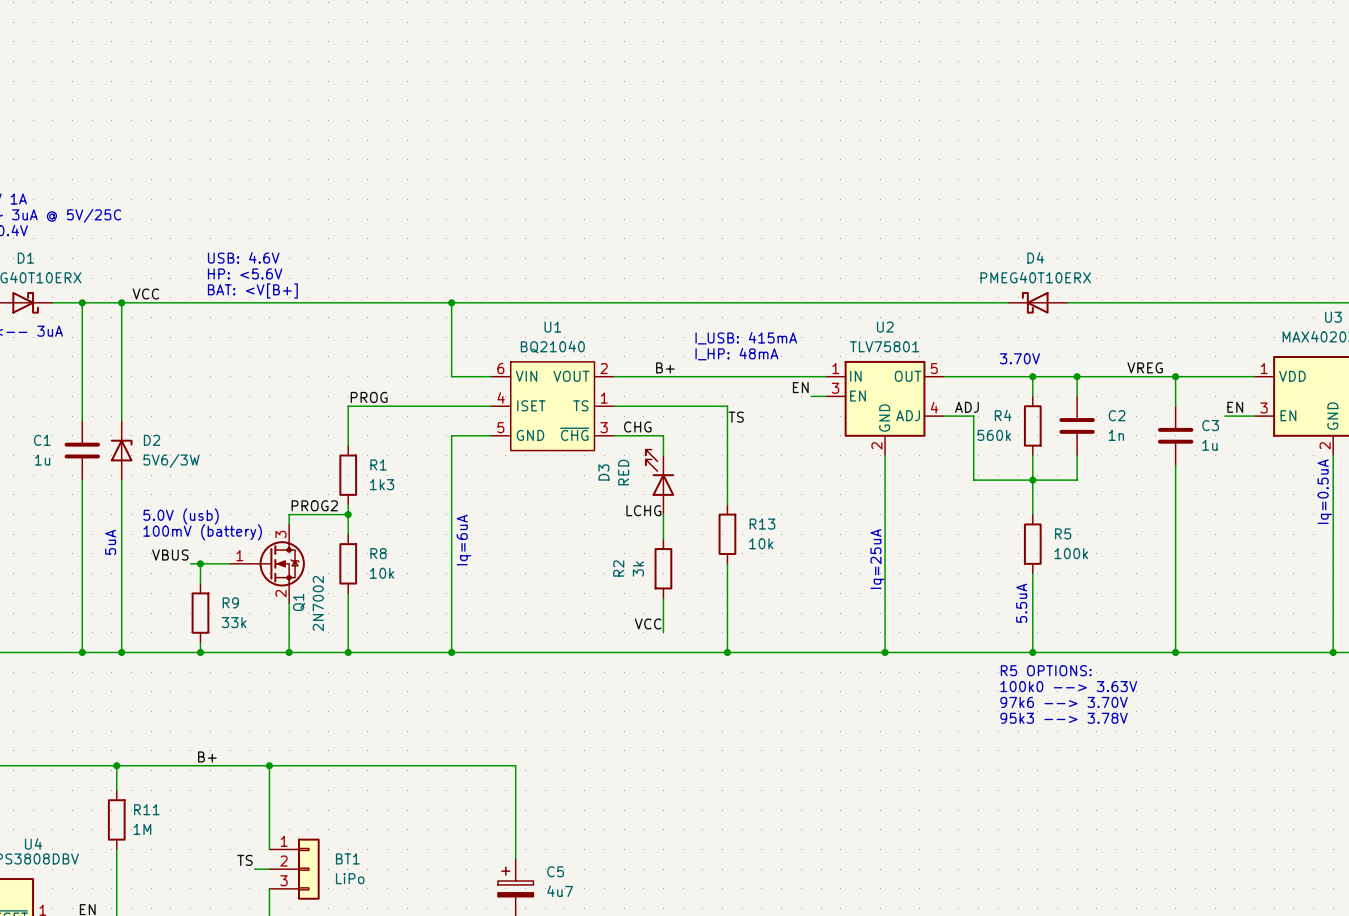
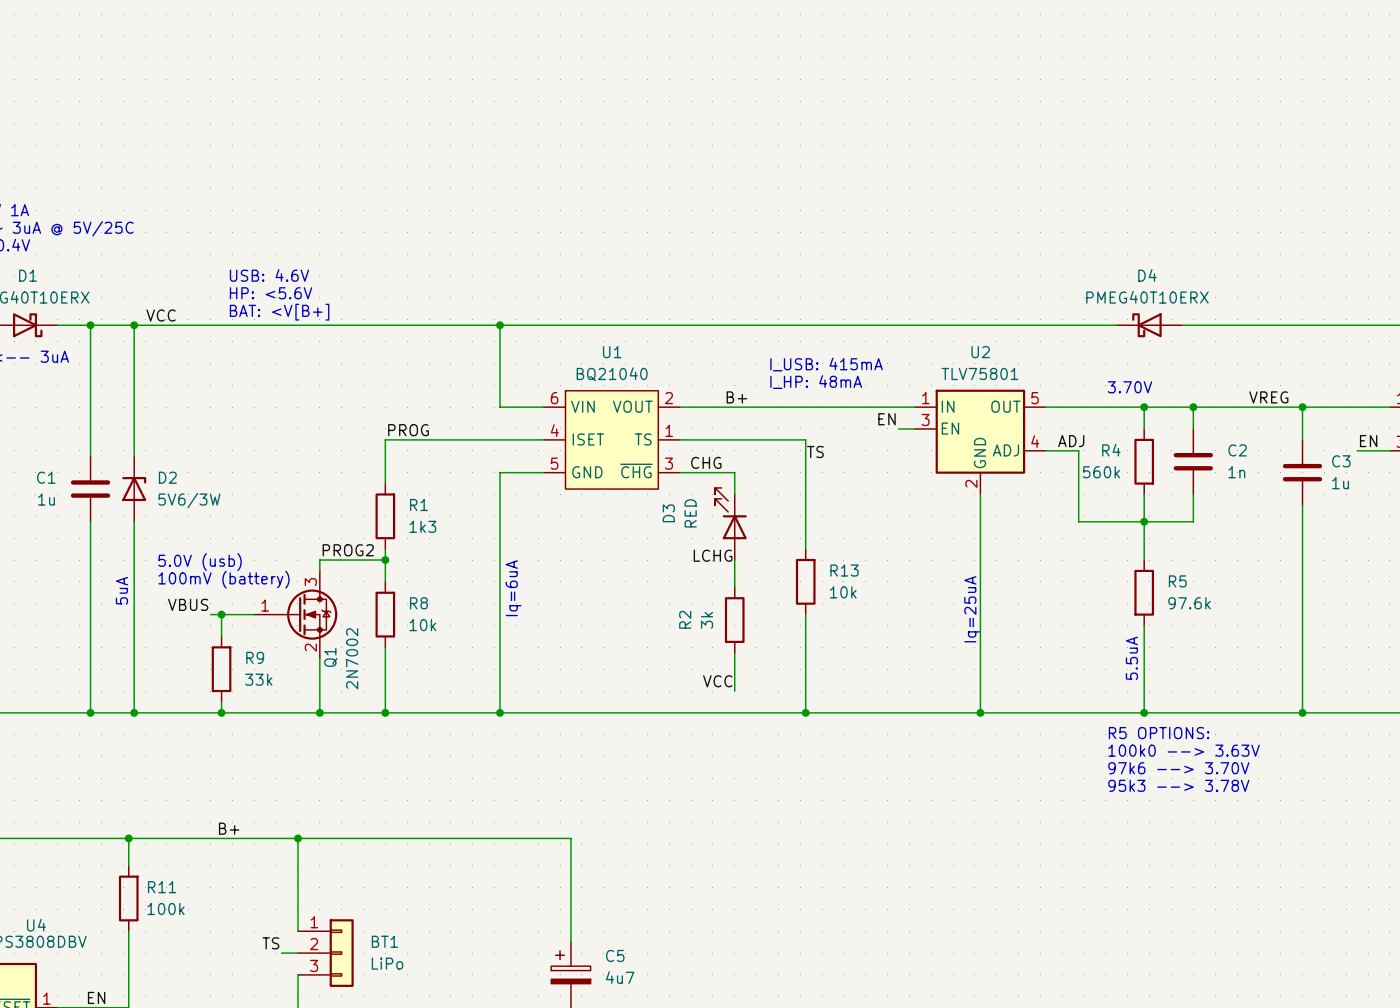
R5 value: 100k (1071, 553) -> 97.6k (1189, 603)
R11 value: 1M (142, 829) -> 100k (166, 909)

